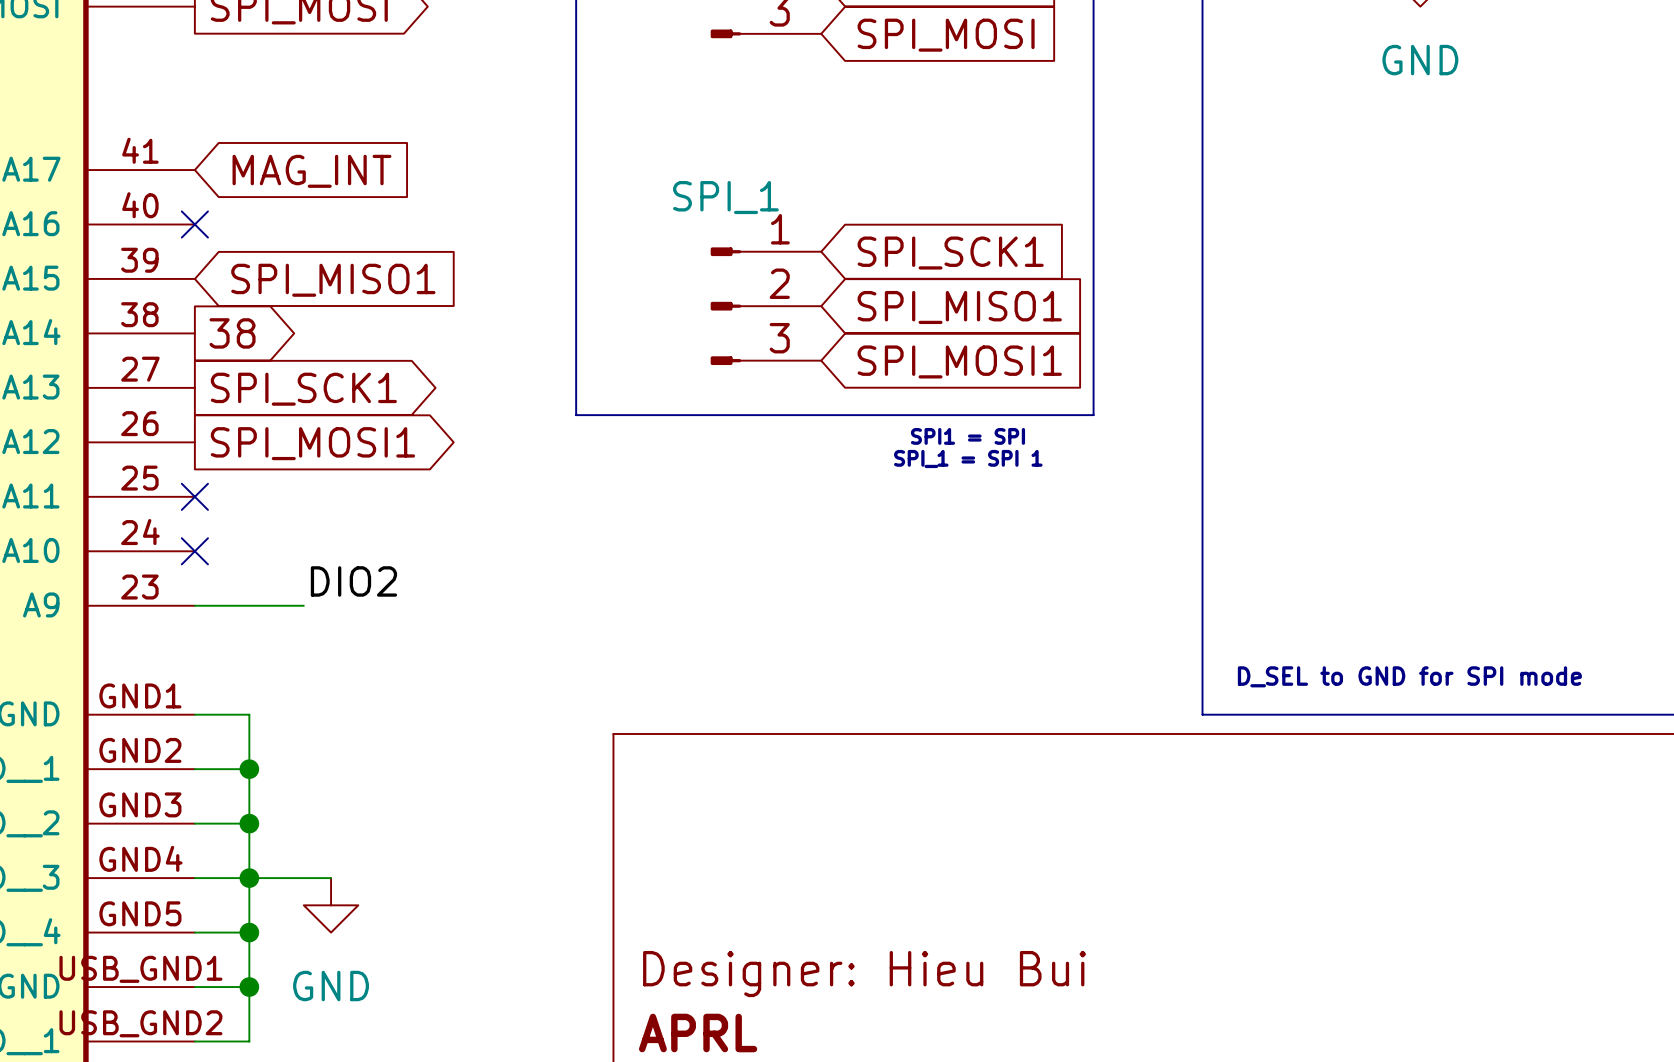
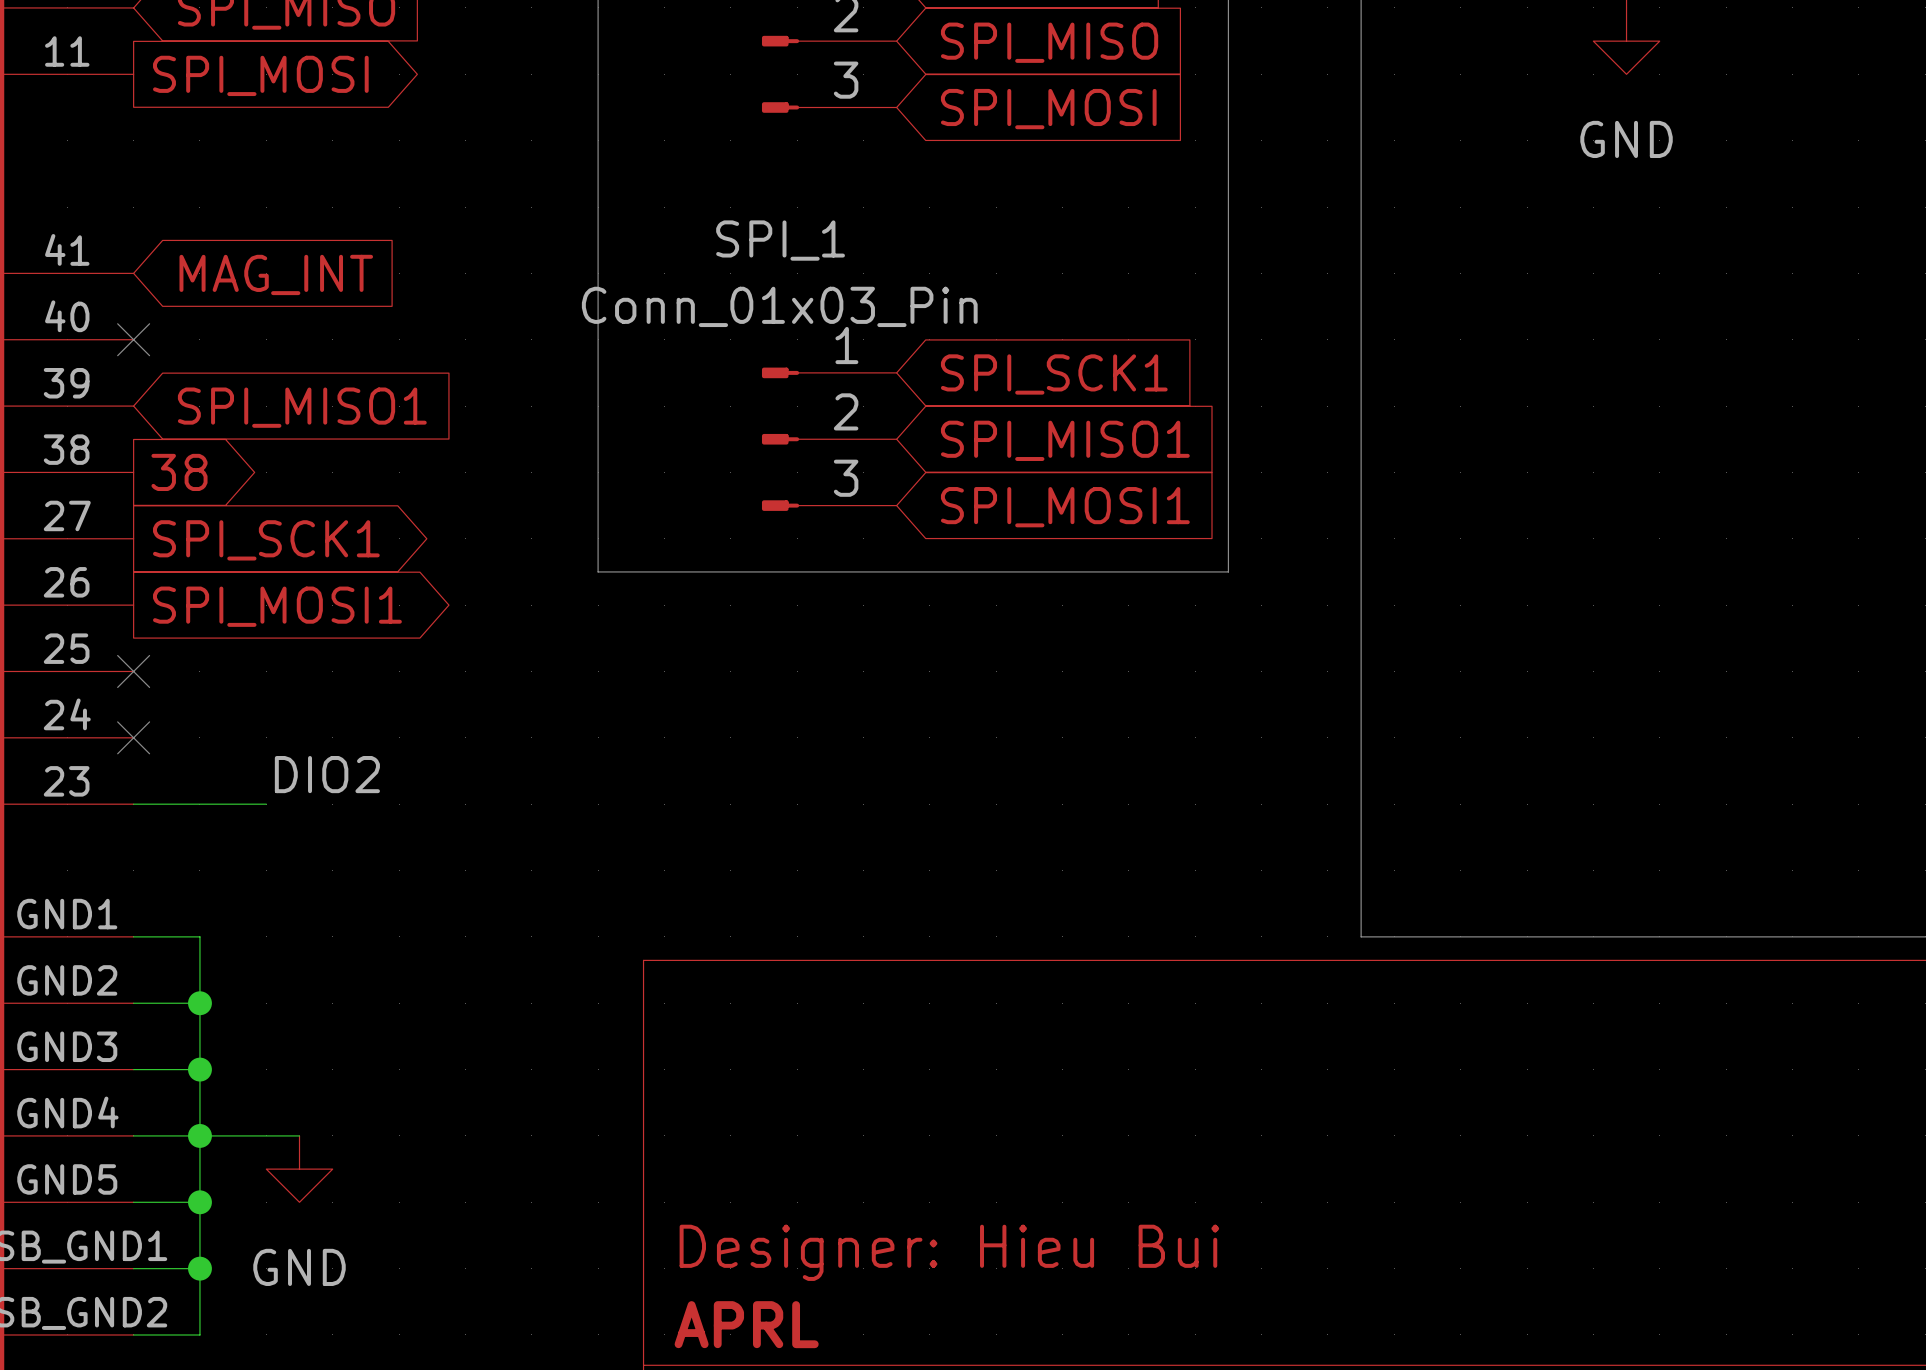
SPI_1 name position: SPI_1 (725, 197) -> SPI_1 (780, 240)
SPI_1 value: none -> Conn_01x03_Pin (779, 306)
text: SPI1 = SPI (967, 436) -> none
text: SPI_1 = SPI 1 (968, 458) -> none
text: D_SEL to GND for SPI mode (1409, 676) -> none

